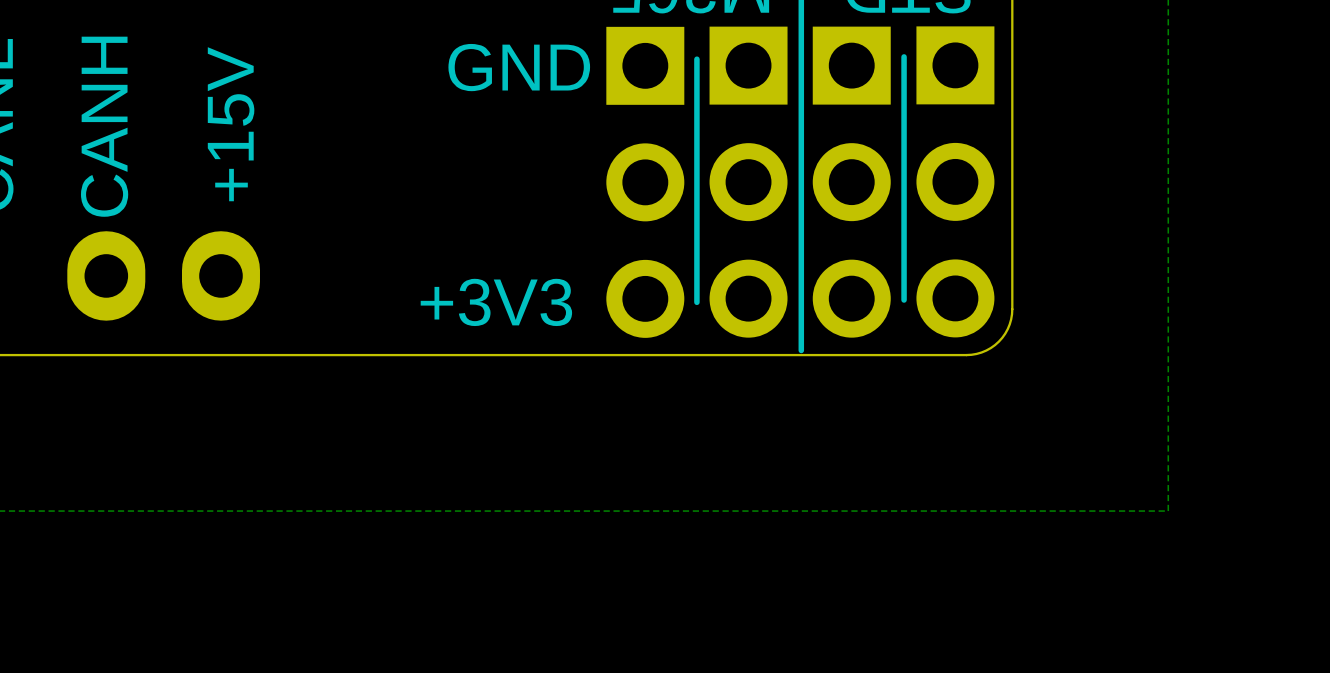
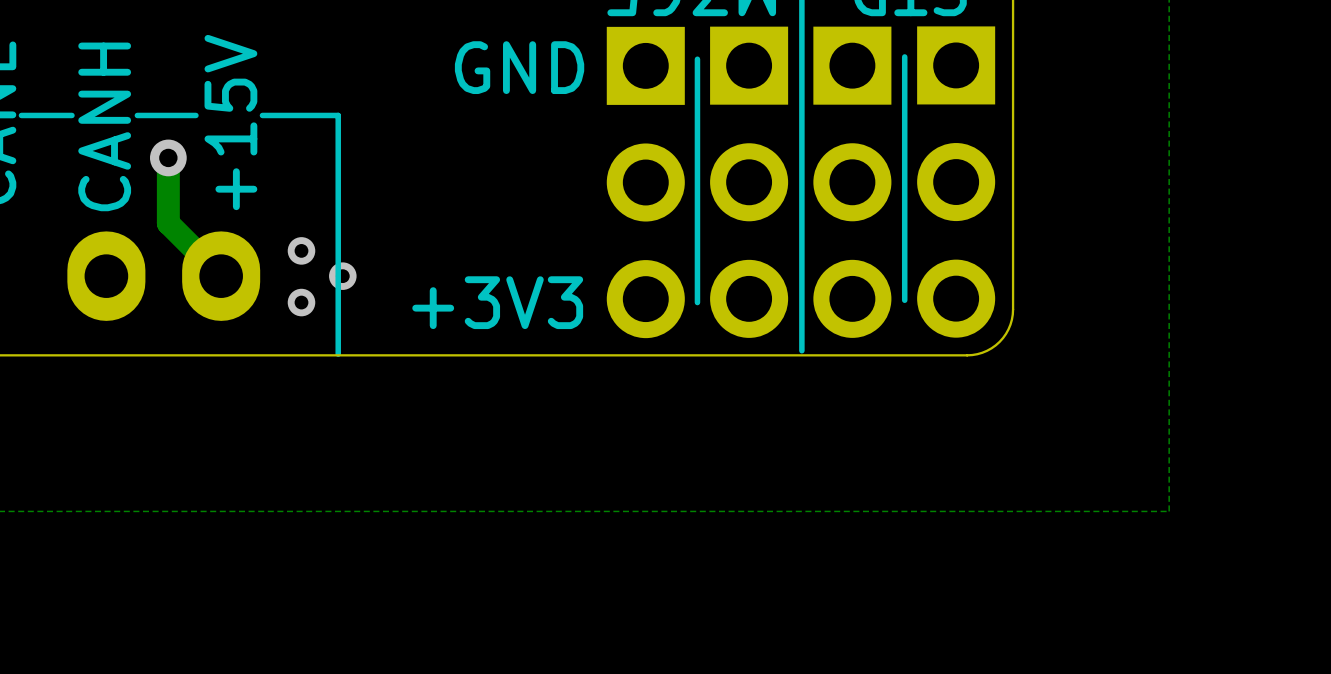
line: none -> (71, 115) (21, 115)
line: none -> (195, 115) (137, 115)
line: none -> (262, 115) (338, 115) (338, 354)
track: none -> (168, 157) (168, 223) (221, 276)
via: none -> (168, 157)
via: none -> (301, 250)
via: none -> (342, 276)
via: none -> (301, 302)

